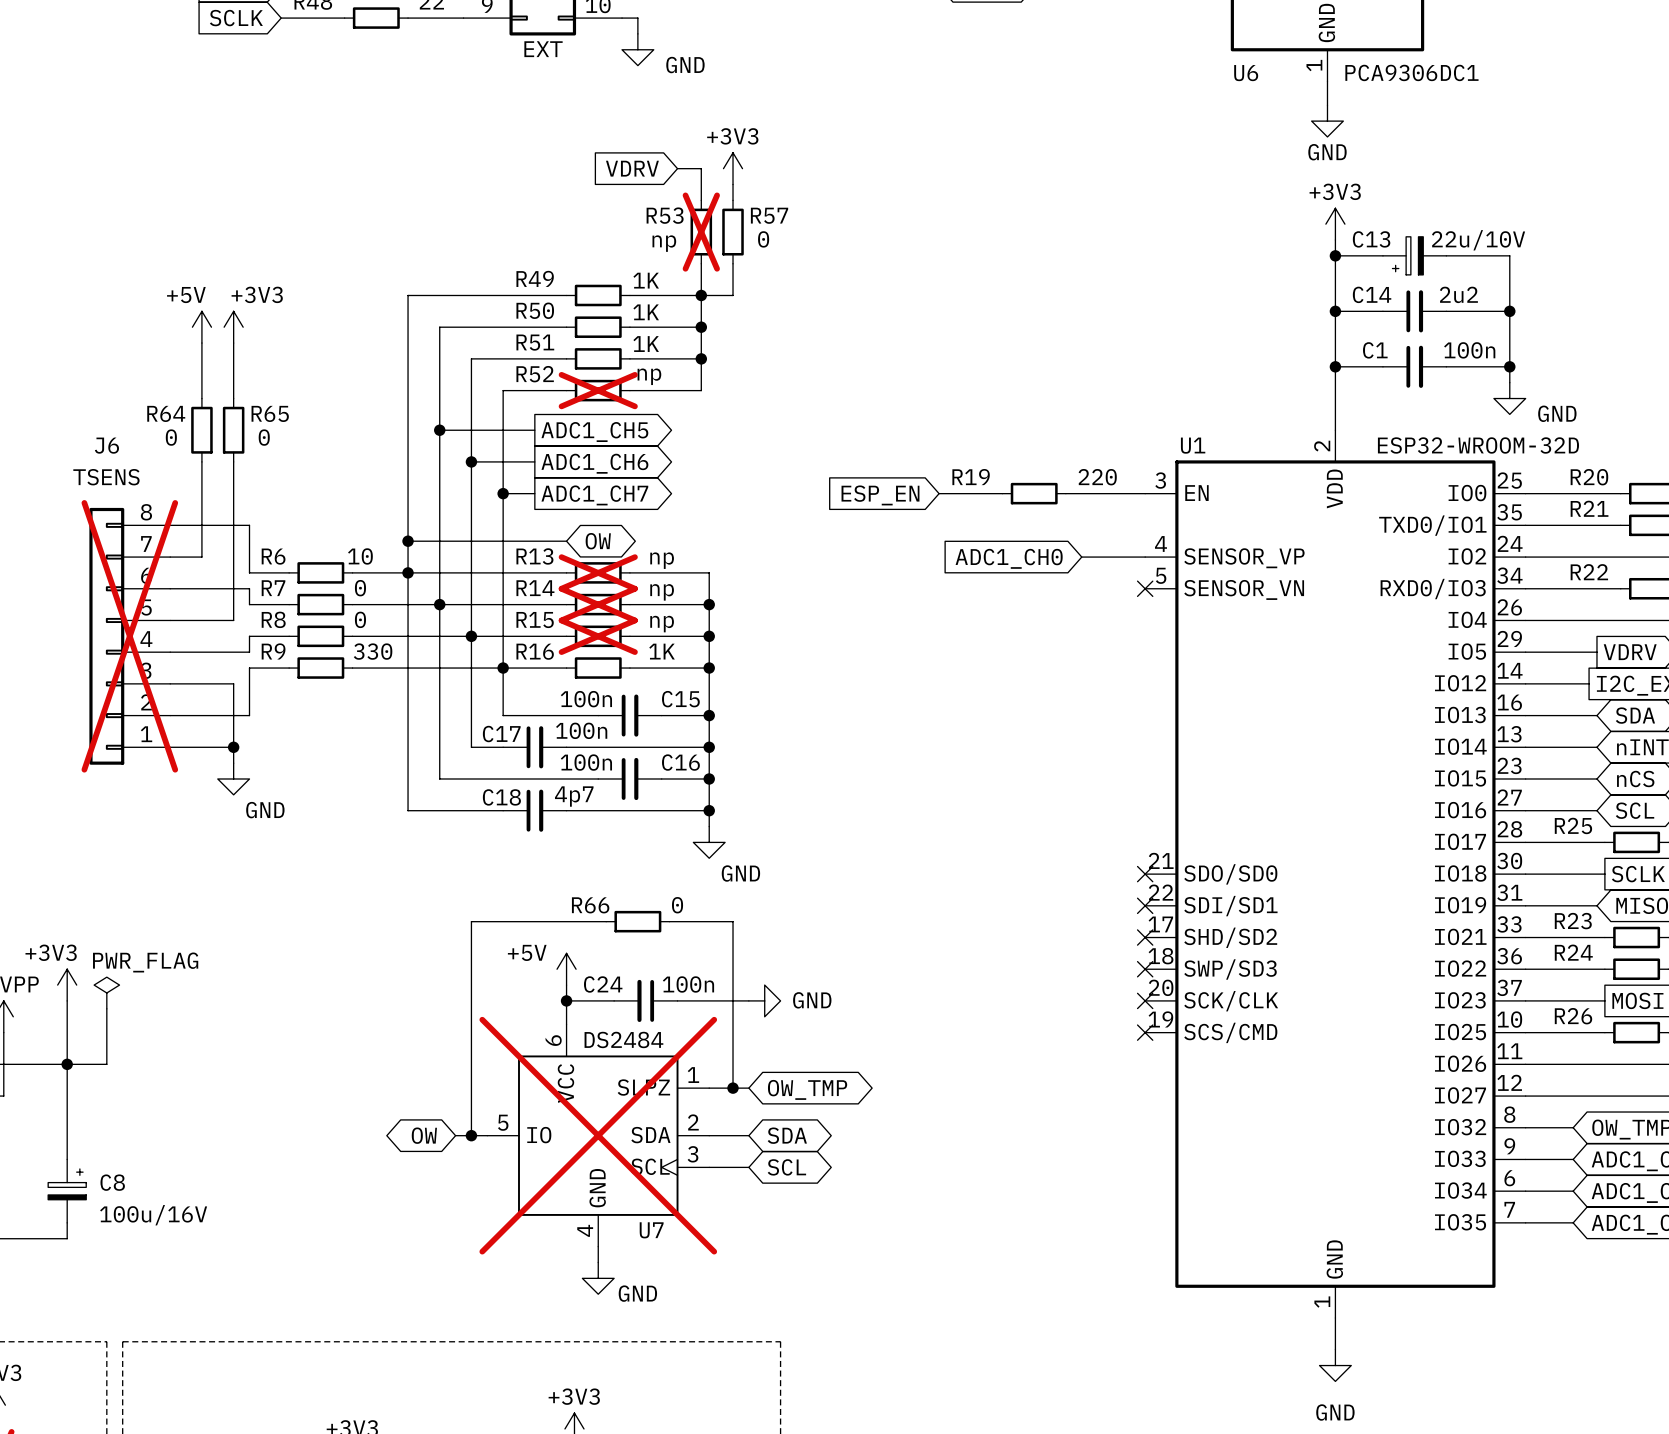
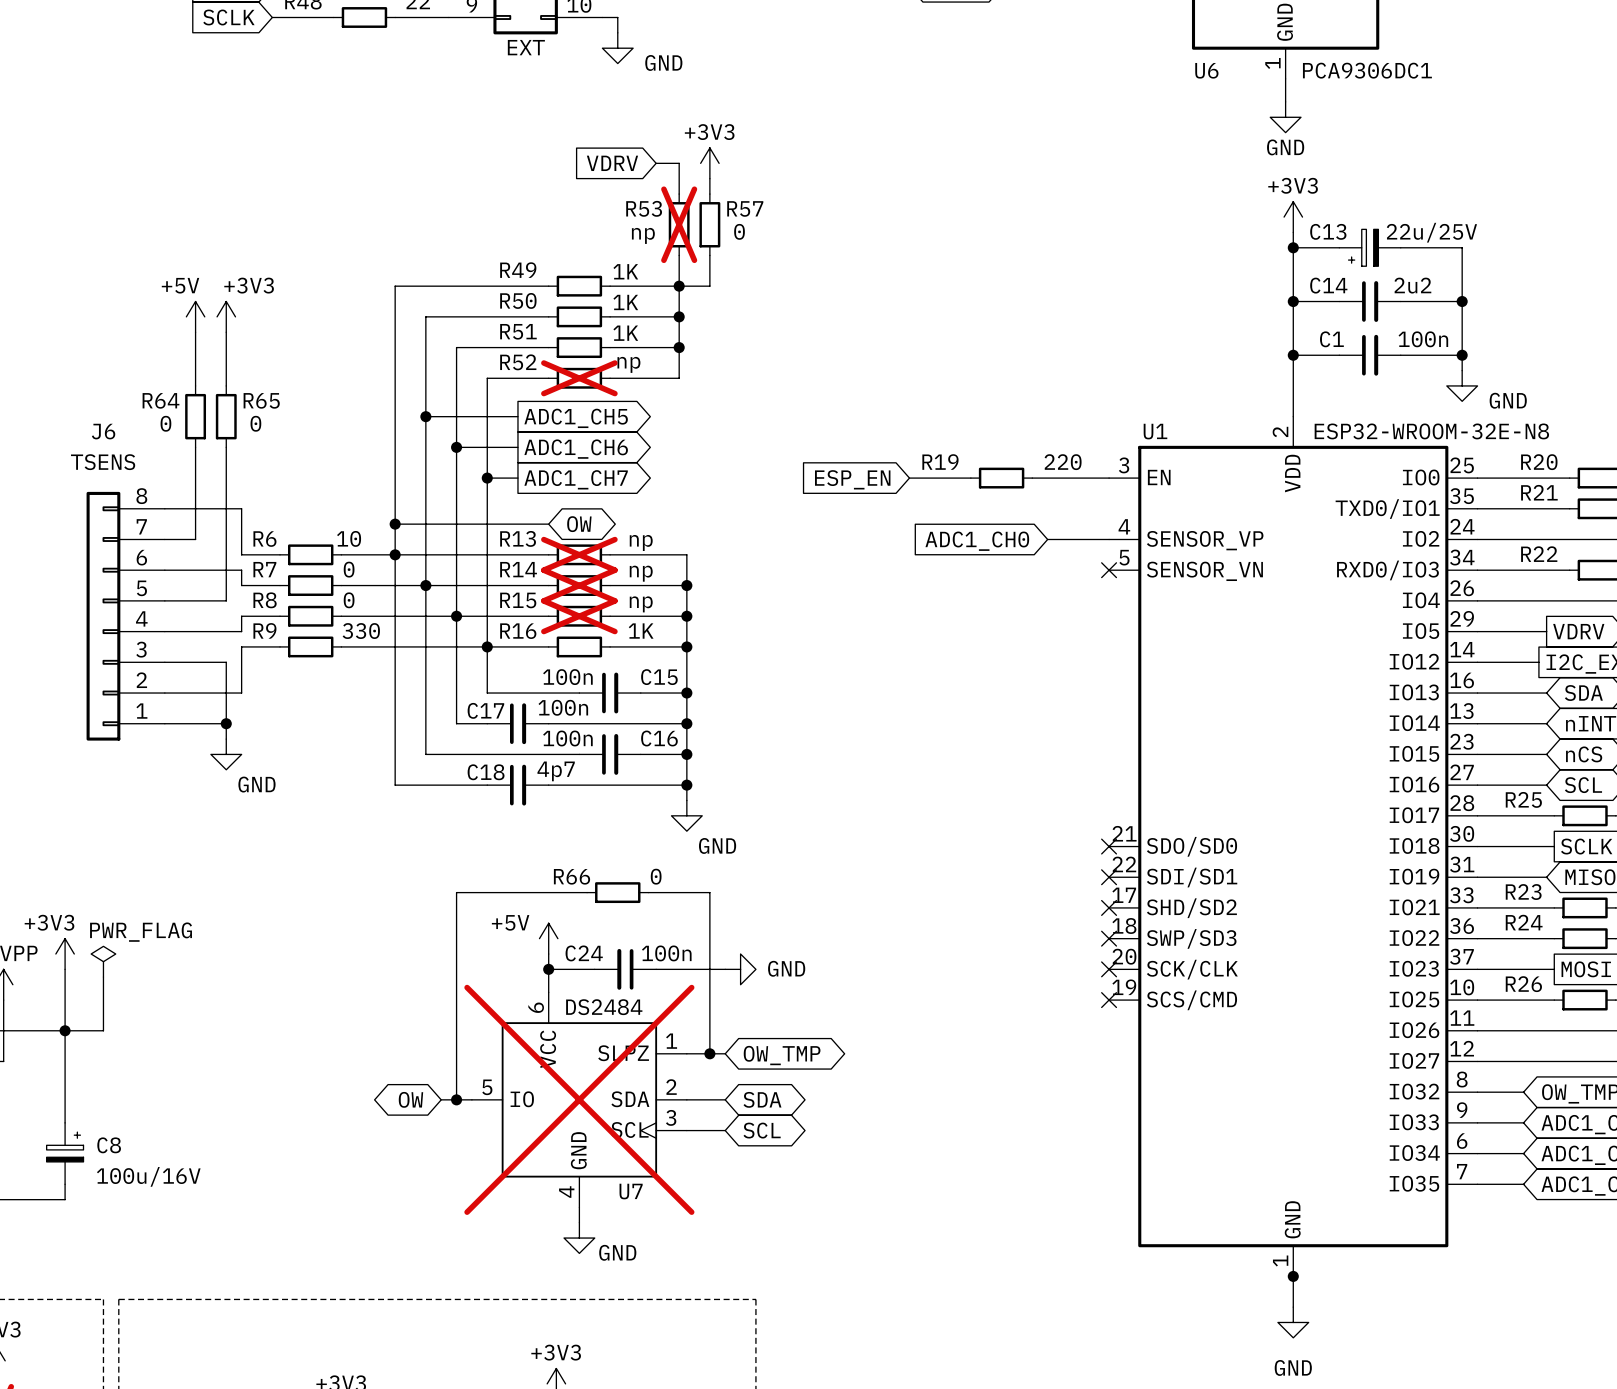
C13 value: 22u/10V (1478, 240) -> 22u/25V (1431, 232)
U1 value: ESP32-WROOM-32D (1478, 445) -> ESP32-WROOM-32E-N8 (1431, 431)
J6 do-not-place cross: (129, 636) -> none
junction: none -> (1293, 1276)

